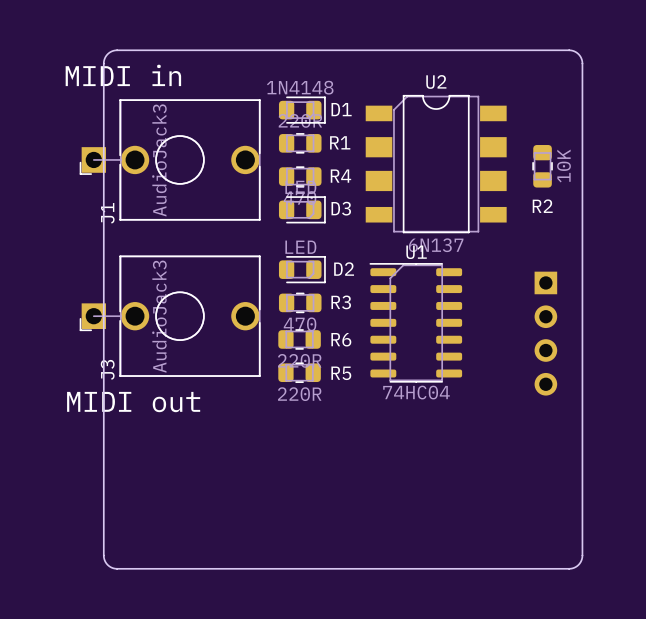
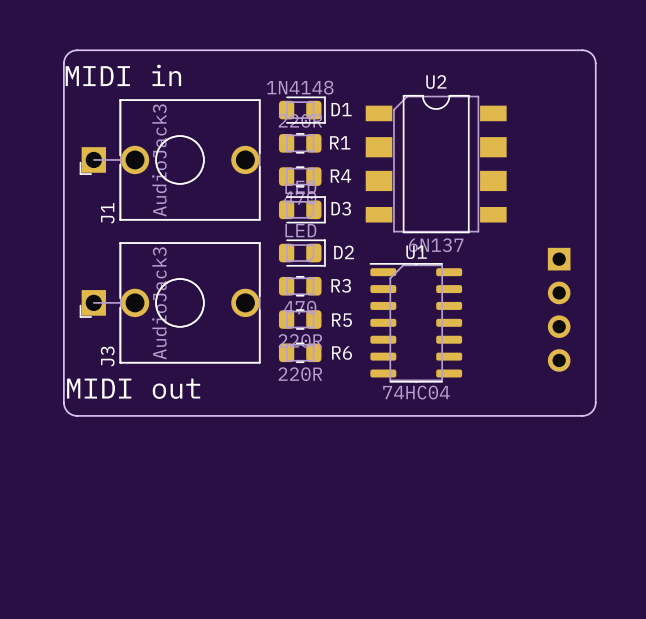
board edge: (117, 50) (107, 54) (103, 63) (103, 555) (107, 564) (117, 568) (569, 568) (579, 563) (582, 555) (582, 63) (578, 54) (569, 50) -> (117, 50) (73, 50) (67, 54) (64, 61) (63, 402) (67, 412) (75, 415) (582, 415) (590, 413) (595, 402) (595, 63) (593, 56) (589, 52) (569, 50)
R2: 10K (542, 166) -> none
D2 position: (302, 269) -> (302, 253)
R3 position: (300, 302) -> (300, 286)
J3 position: (170, 316) -> (170, 302)
part position: (545, 333) -> (559, 309)
R6 position: (299, 339) -> (300, 352)
R5 position: (299, 372) -> (300, 319)
text position: MIDI out (133, 402) -> MIDI out (133, 388)

